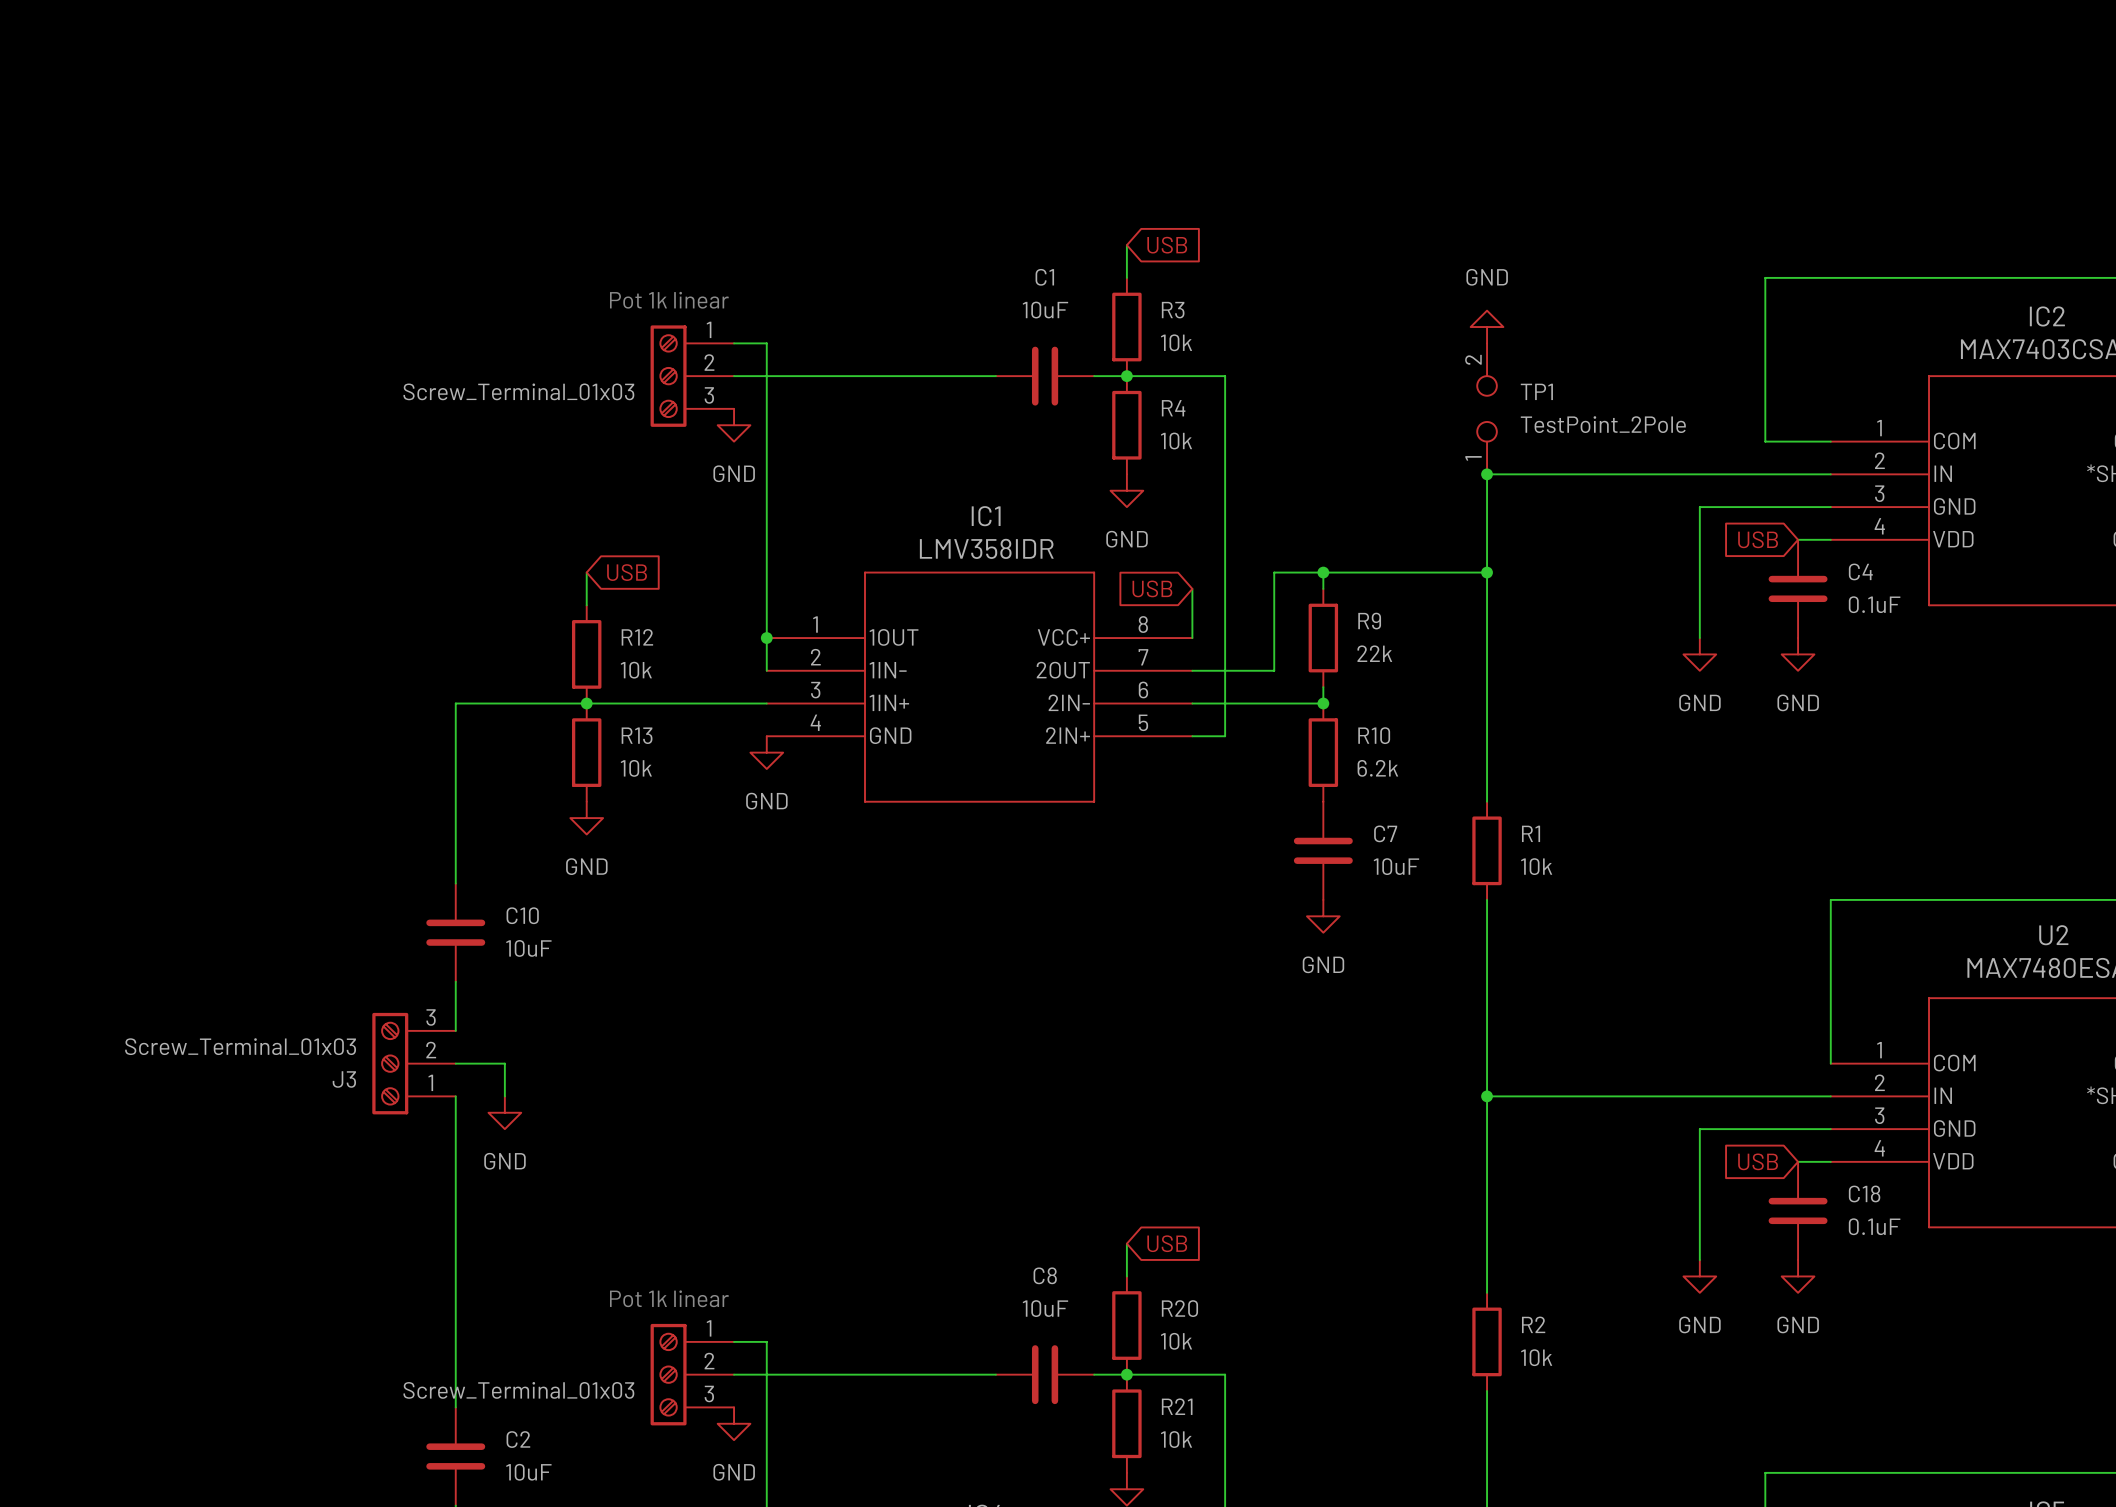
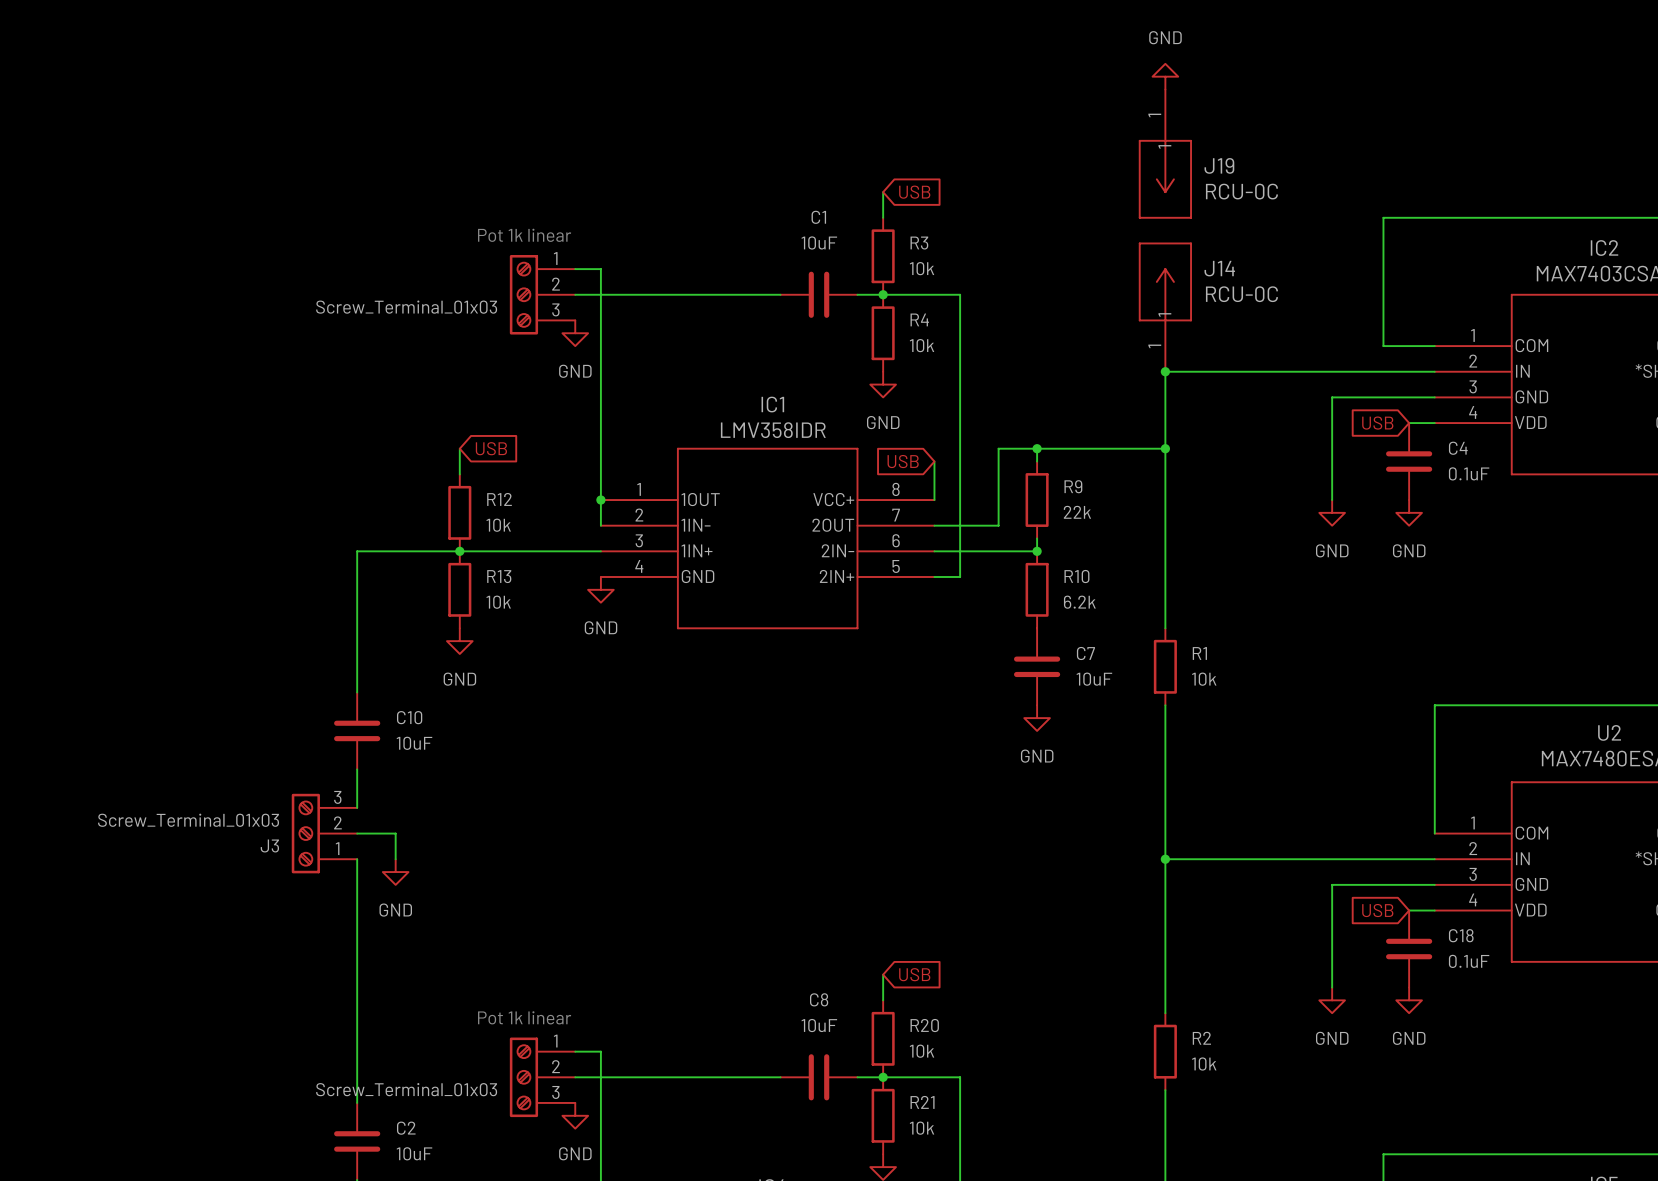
J19: none -> RCU-0C (1165, 153)
power symbol position: GND (1487, 327) -> GND (1165, 76)
J14: none -> RCU-0C (1165, 307)
TP1: TestPoint_2Pole (1487, 408) -> none

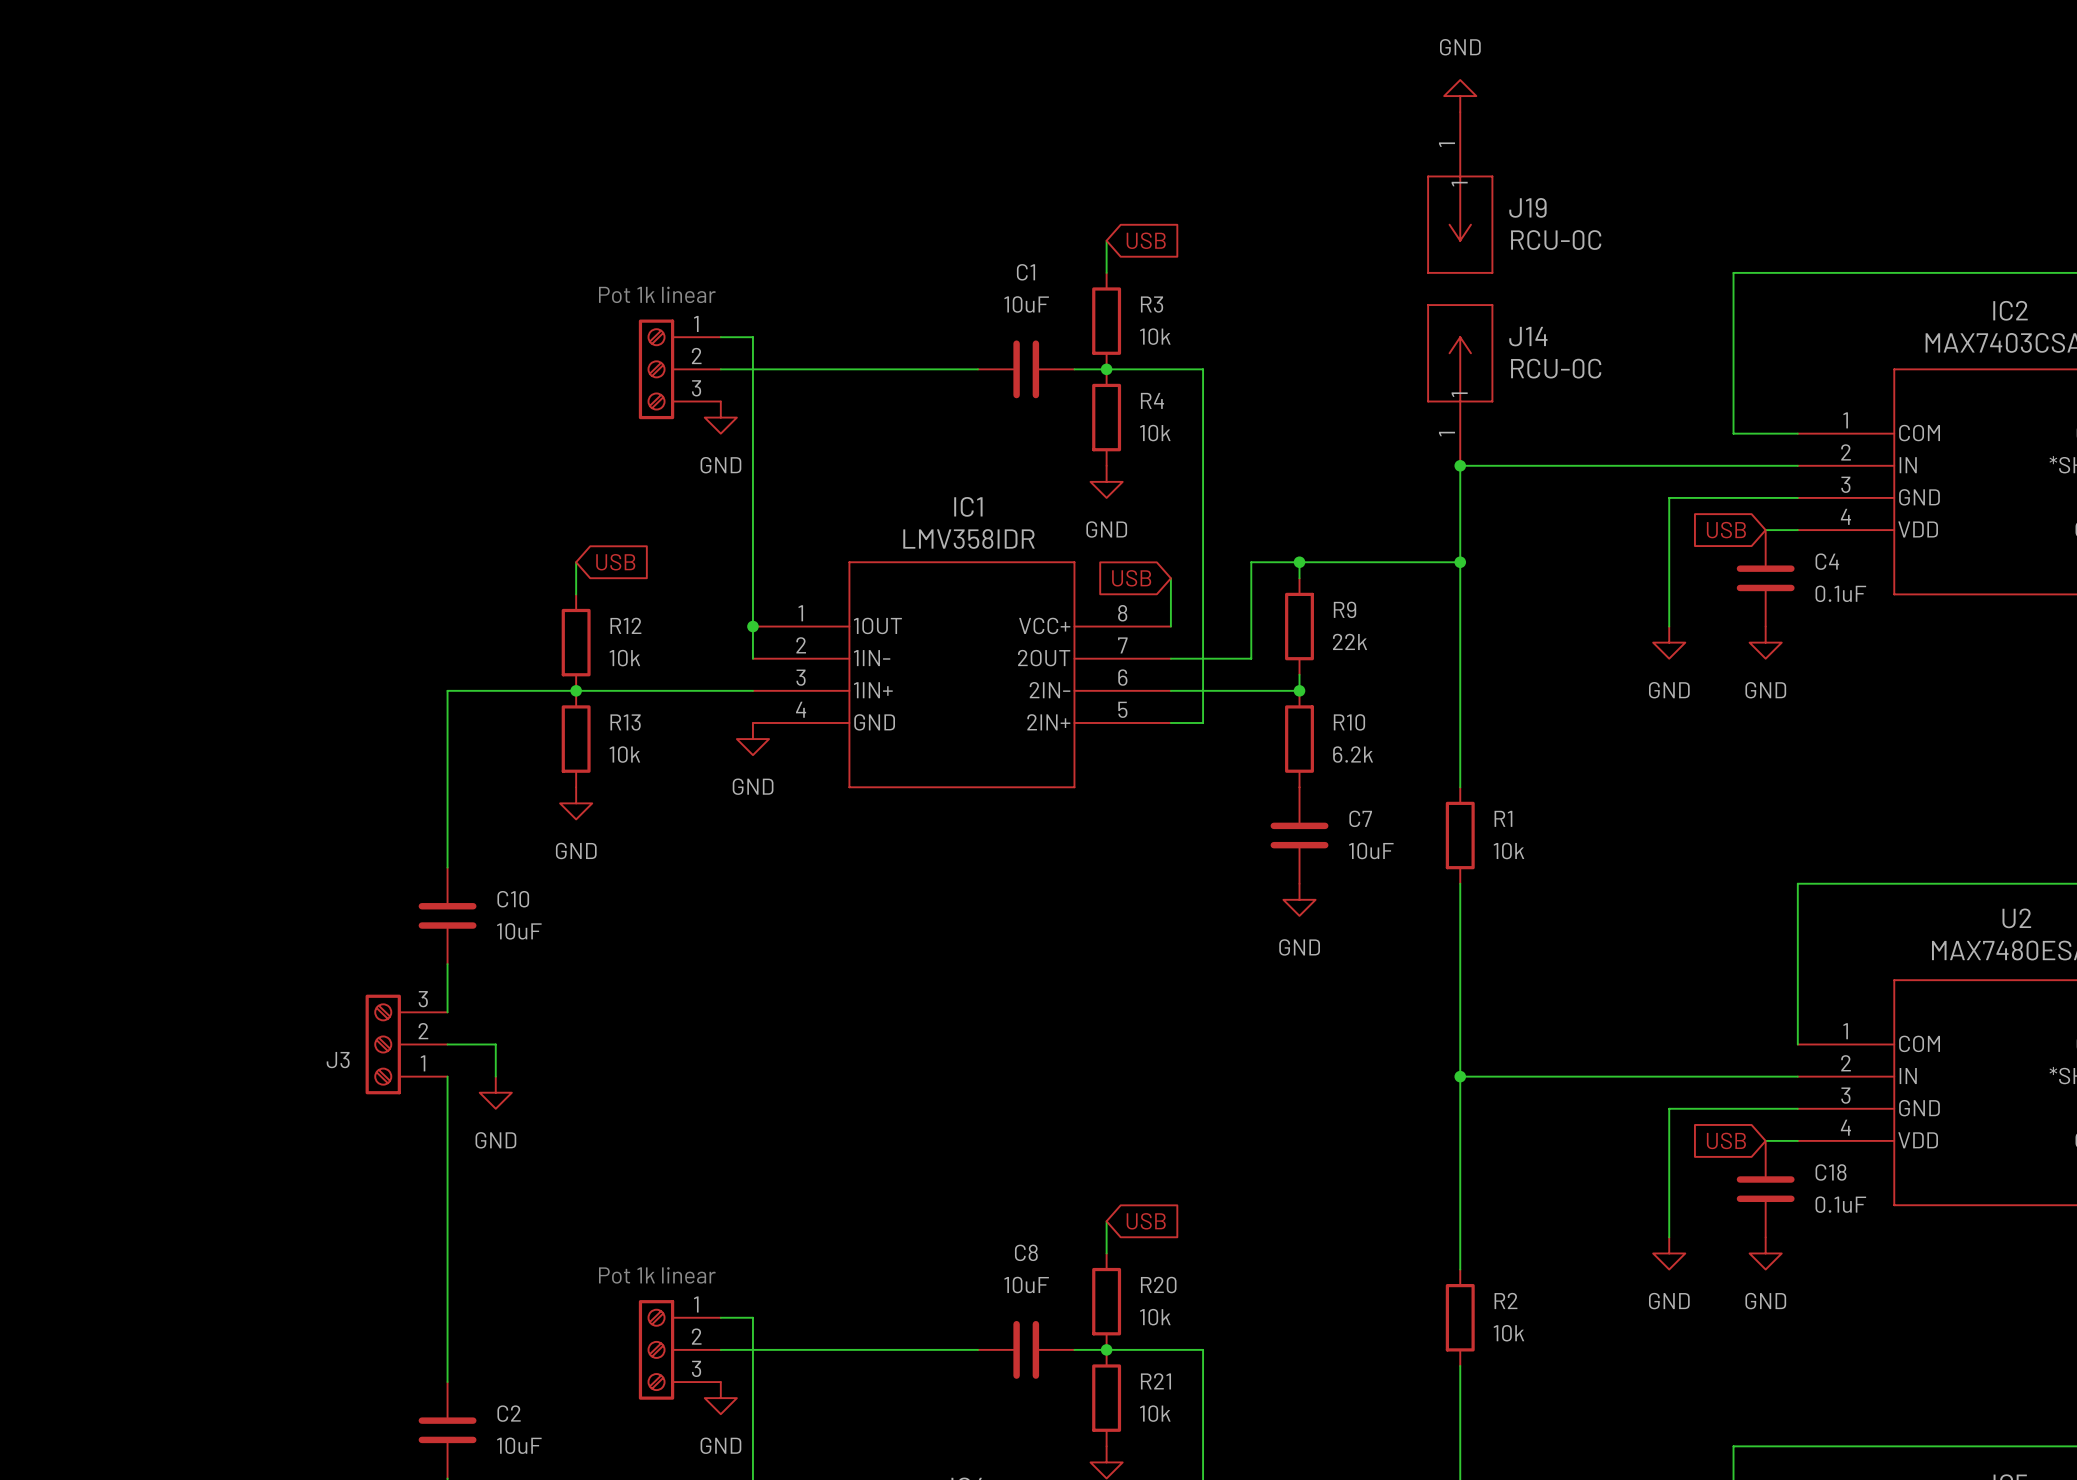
part value: Screw_Terminal_01x03 (406, 307) -> none
J3 value: Screw_Terminal_01x03 (188, 820) -> none
part value: Screw_Terminal_01x03 (406, 1089) -> none

